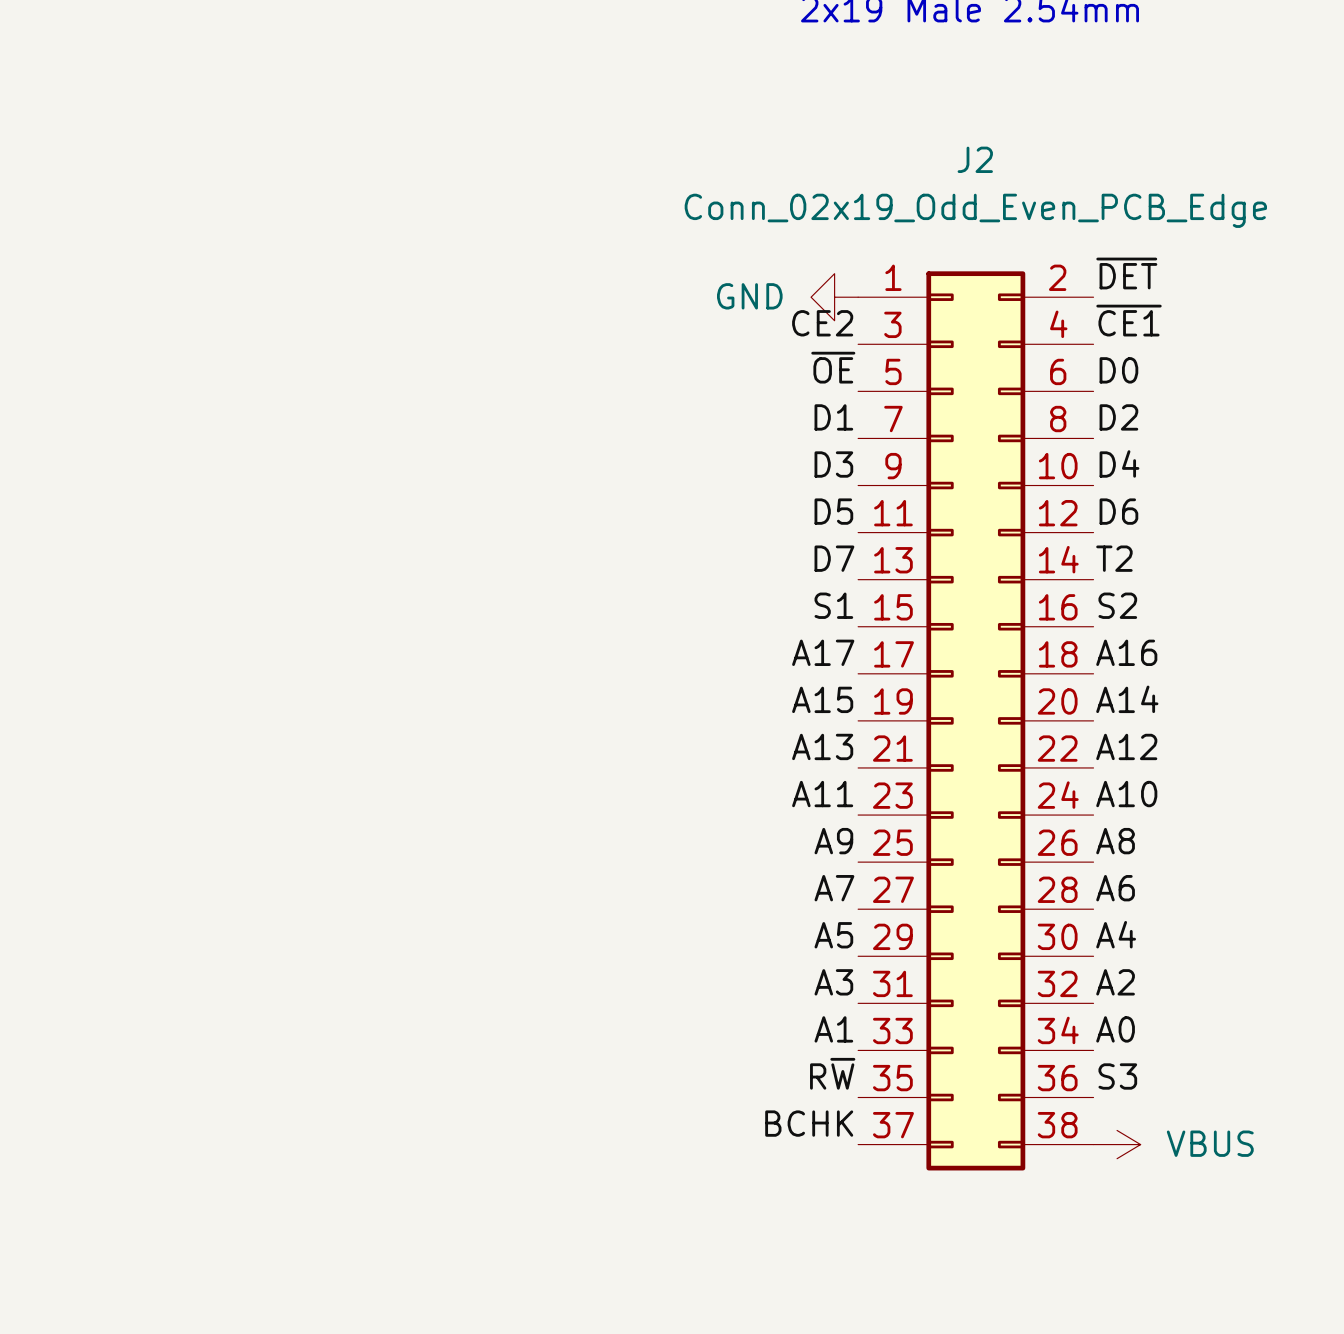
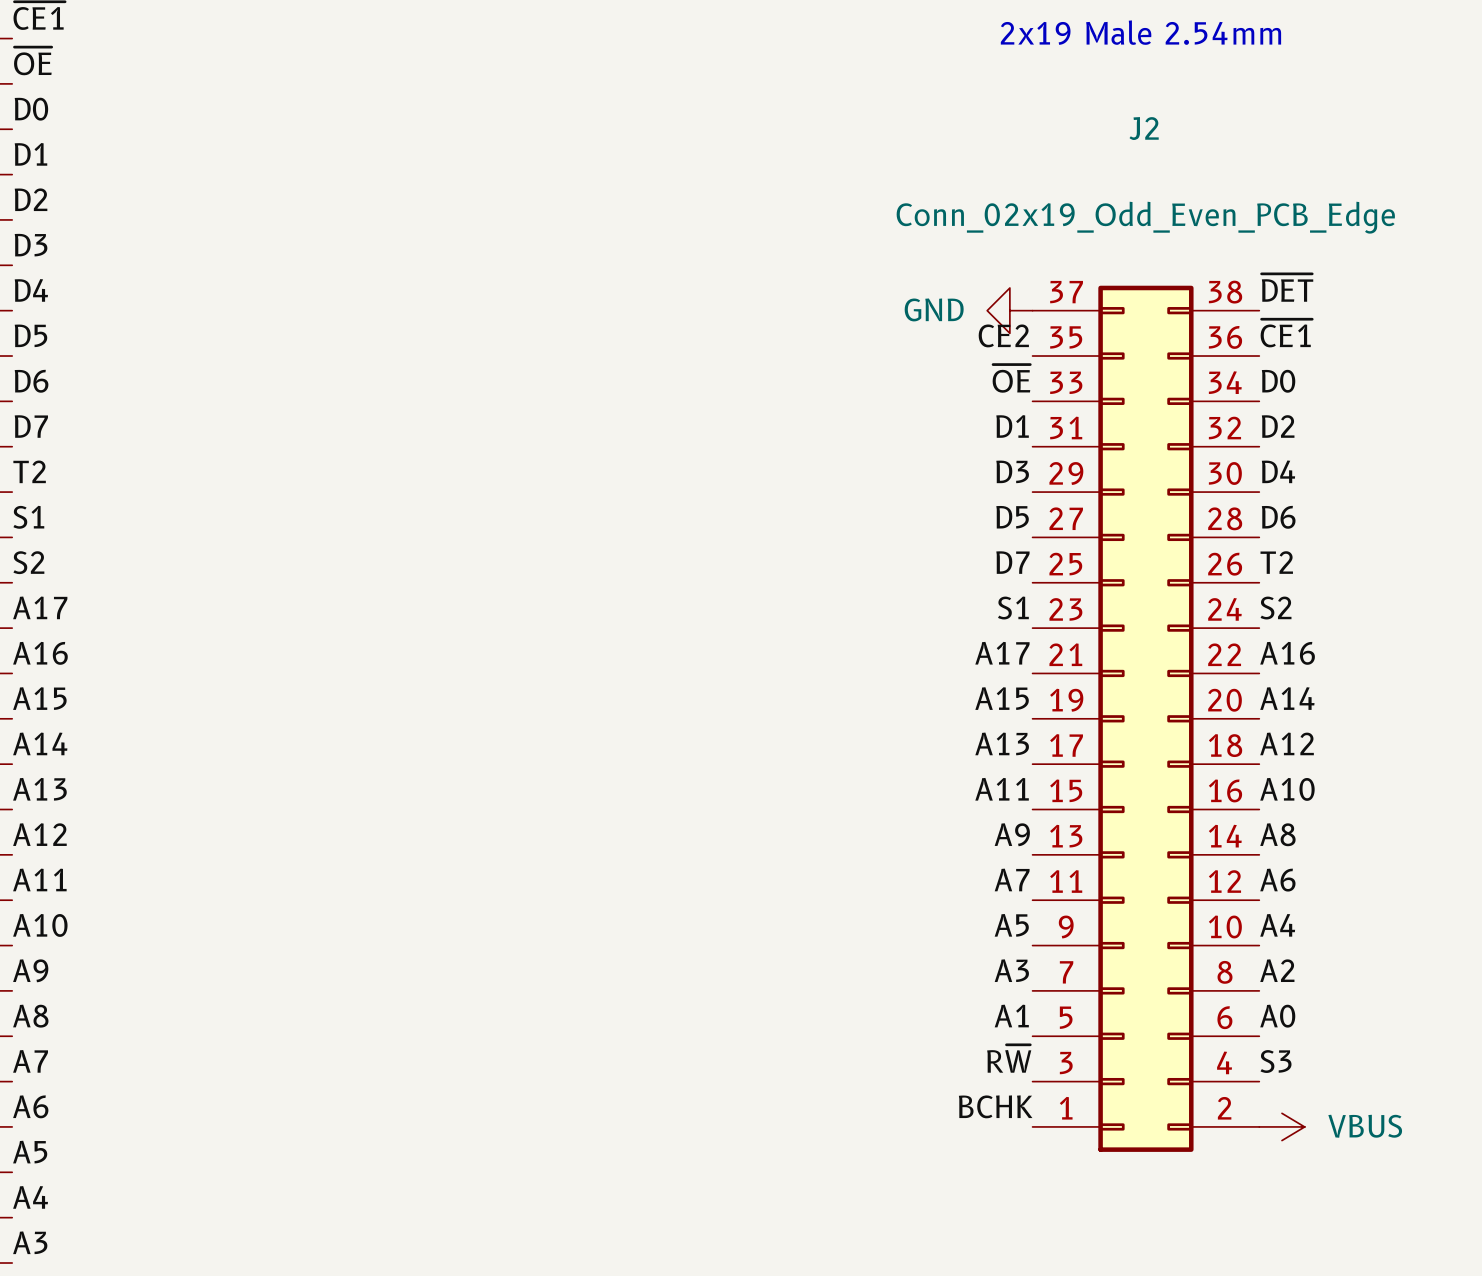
J2 name position: J2 (975, 159) -> J2 (1144, 128)
J2 flip: as is (975, 720) -> up-down (1145, 718)

